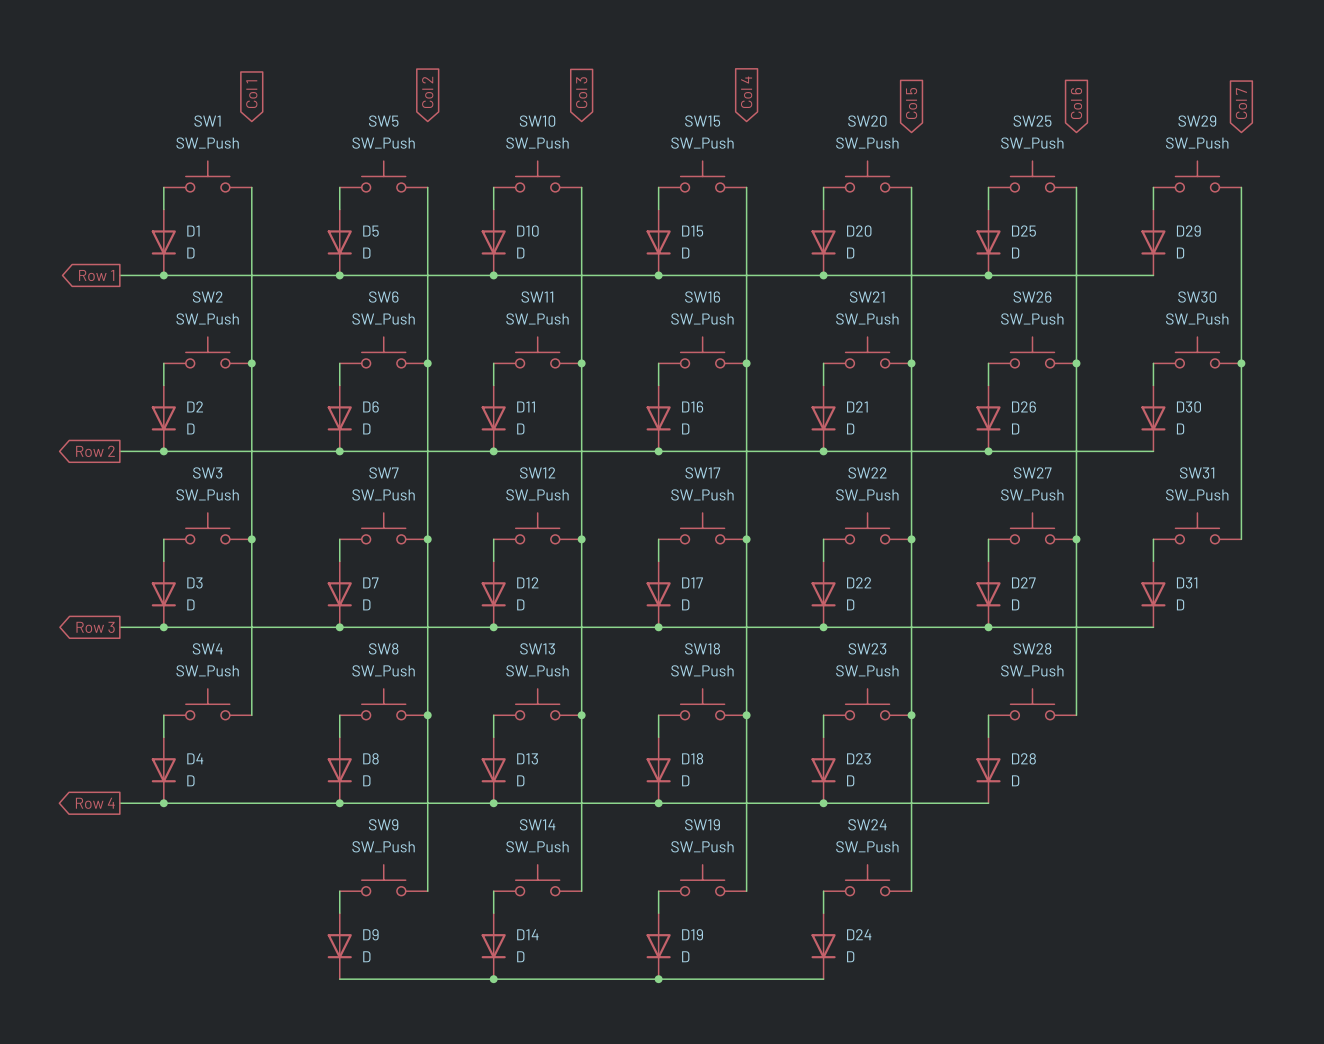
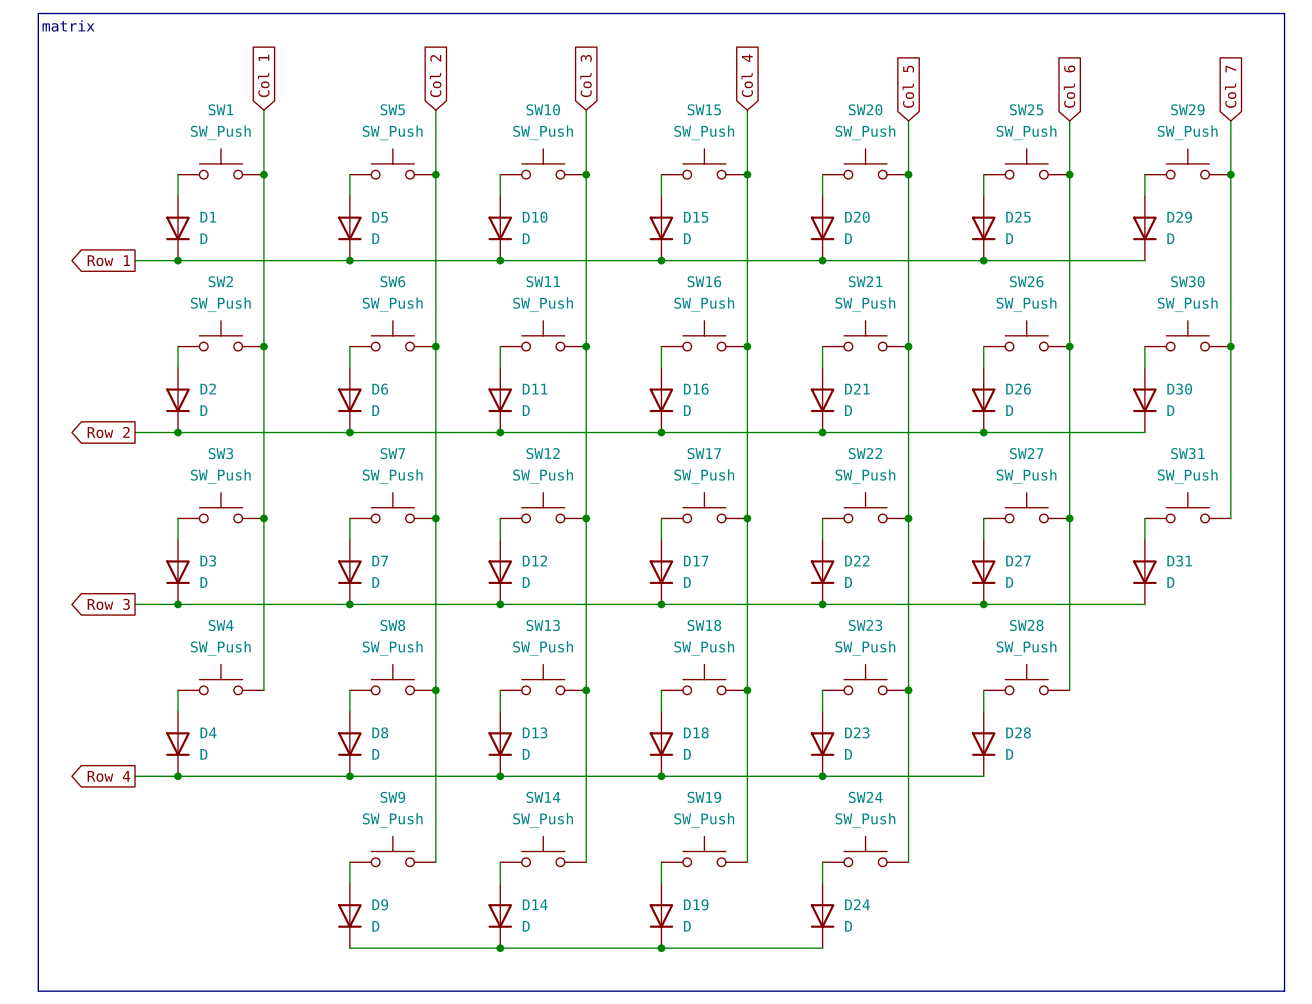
line: none -> (38, 13) (1284, 13) (1284, 991) (38, 991) (38, 13)
text: none -> matrix (68, 25)
wire: none -> (263, 110) (263, 174)
wire: none -> (435, 110) (435, 174)
wire: none -> (586, 110) (586, 174)
wire: none -> (747, 110) (747, 174)
wire: none -> (908, 120) (908, 174)
wire: none -> (1069, 120) (1069, 174)
wire: none -> (1230, 120) (1230, 174)
junction: none -> (263, 174)
junction: none -> (435, 174)
junction: none -> (586, 174)
junction: none -> (747, 174)
junction: none -> (908, 174)
junction: none -> (1069, 174)
junction: none -> (1230, 174)

